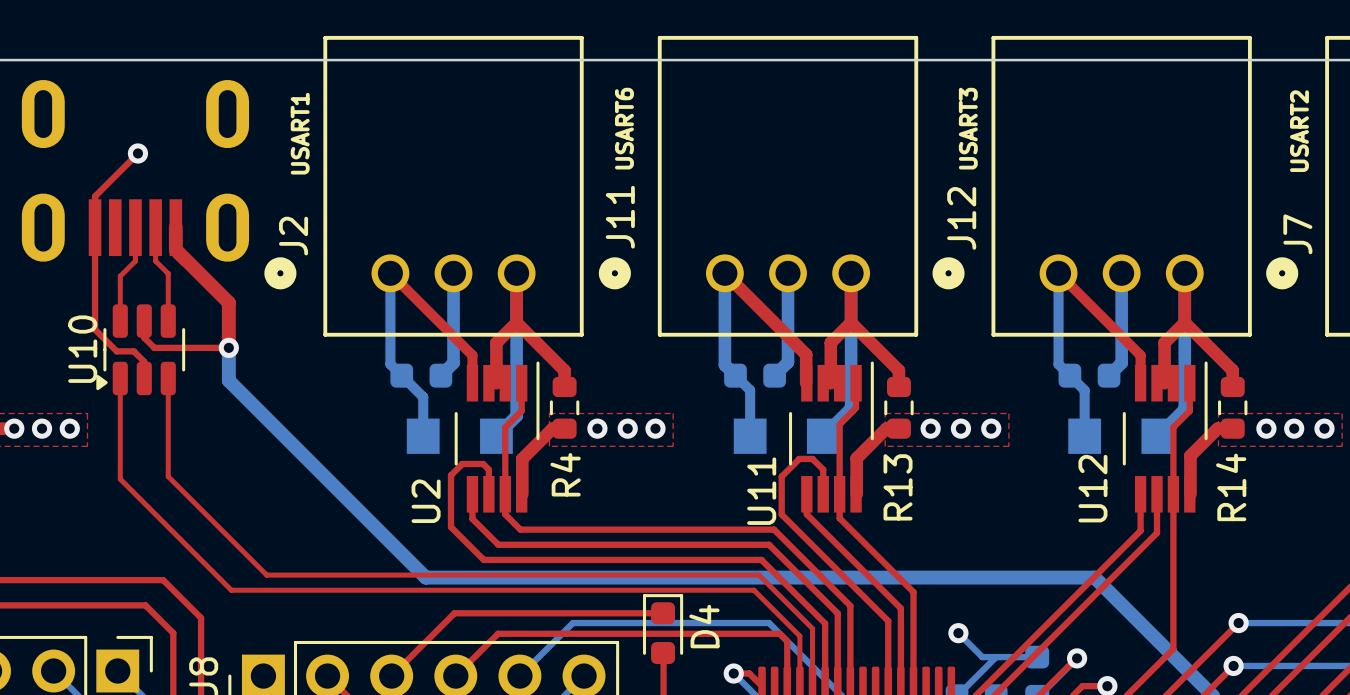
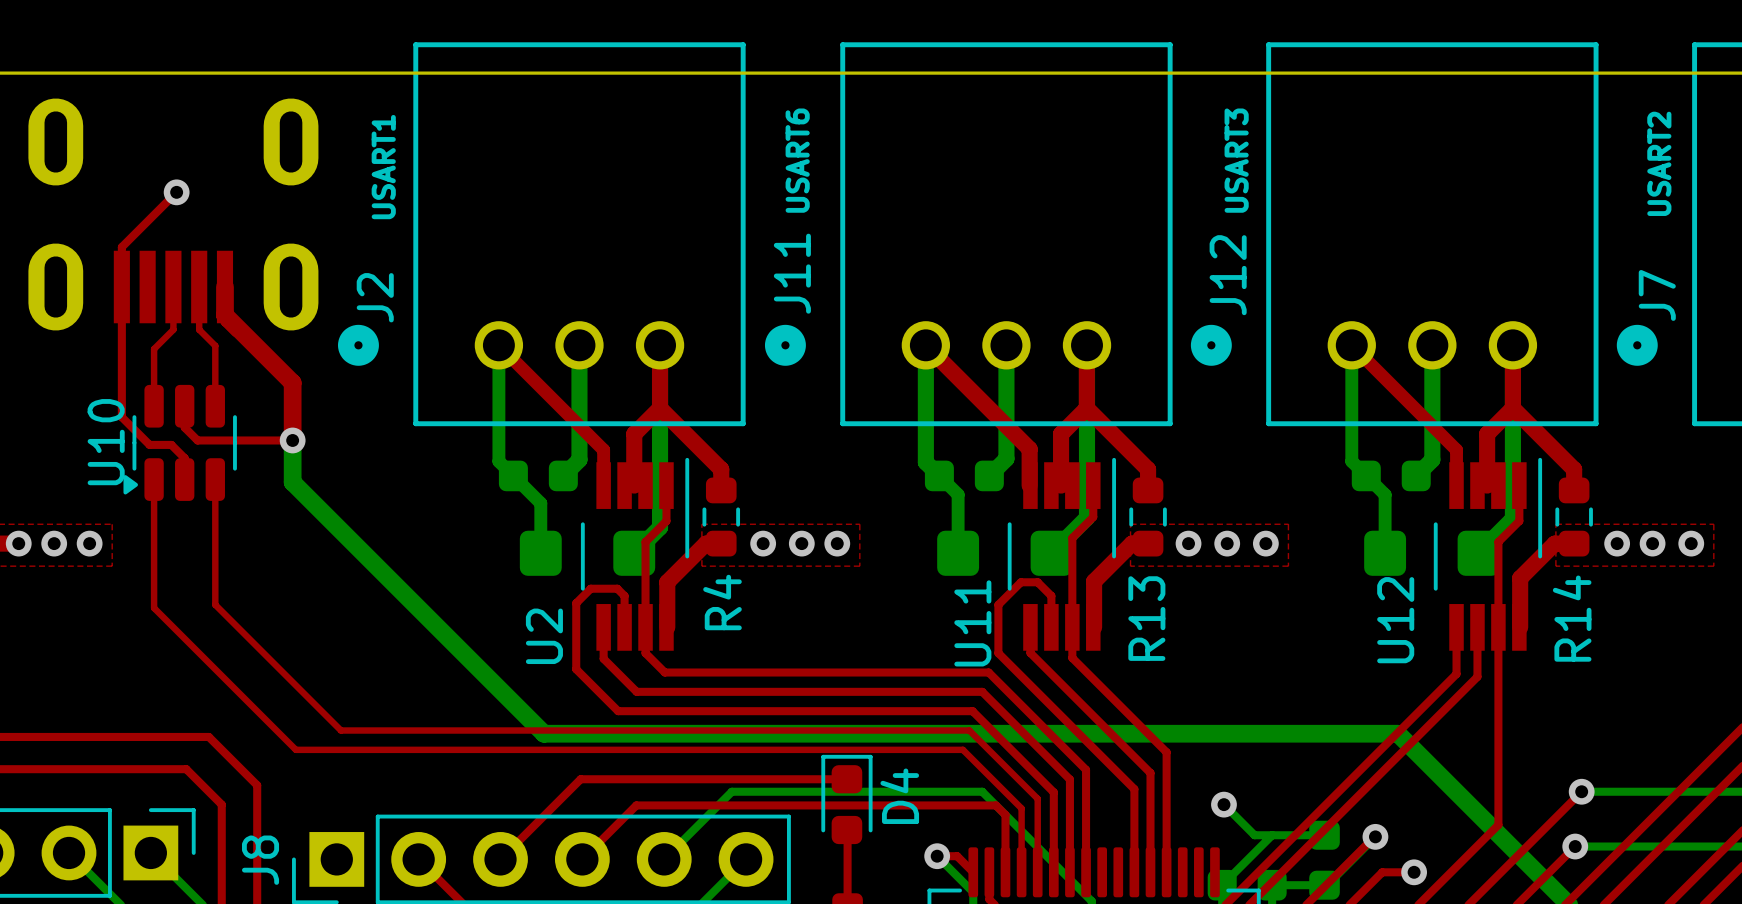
part footprint: [406, 418, 513, 454] -> [519, 530, 656, 576]
part footprint: [733, 418, 840, 454] -> [937, 530, 1073, 576]
part footprint: [1068, 418, 1175, 454] -> [1364, 530, 1500, 576]

